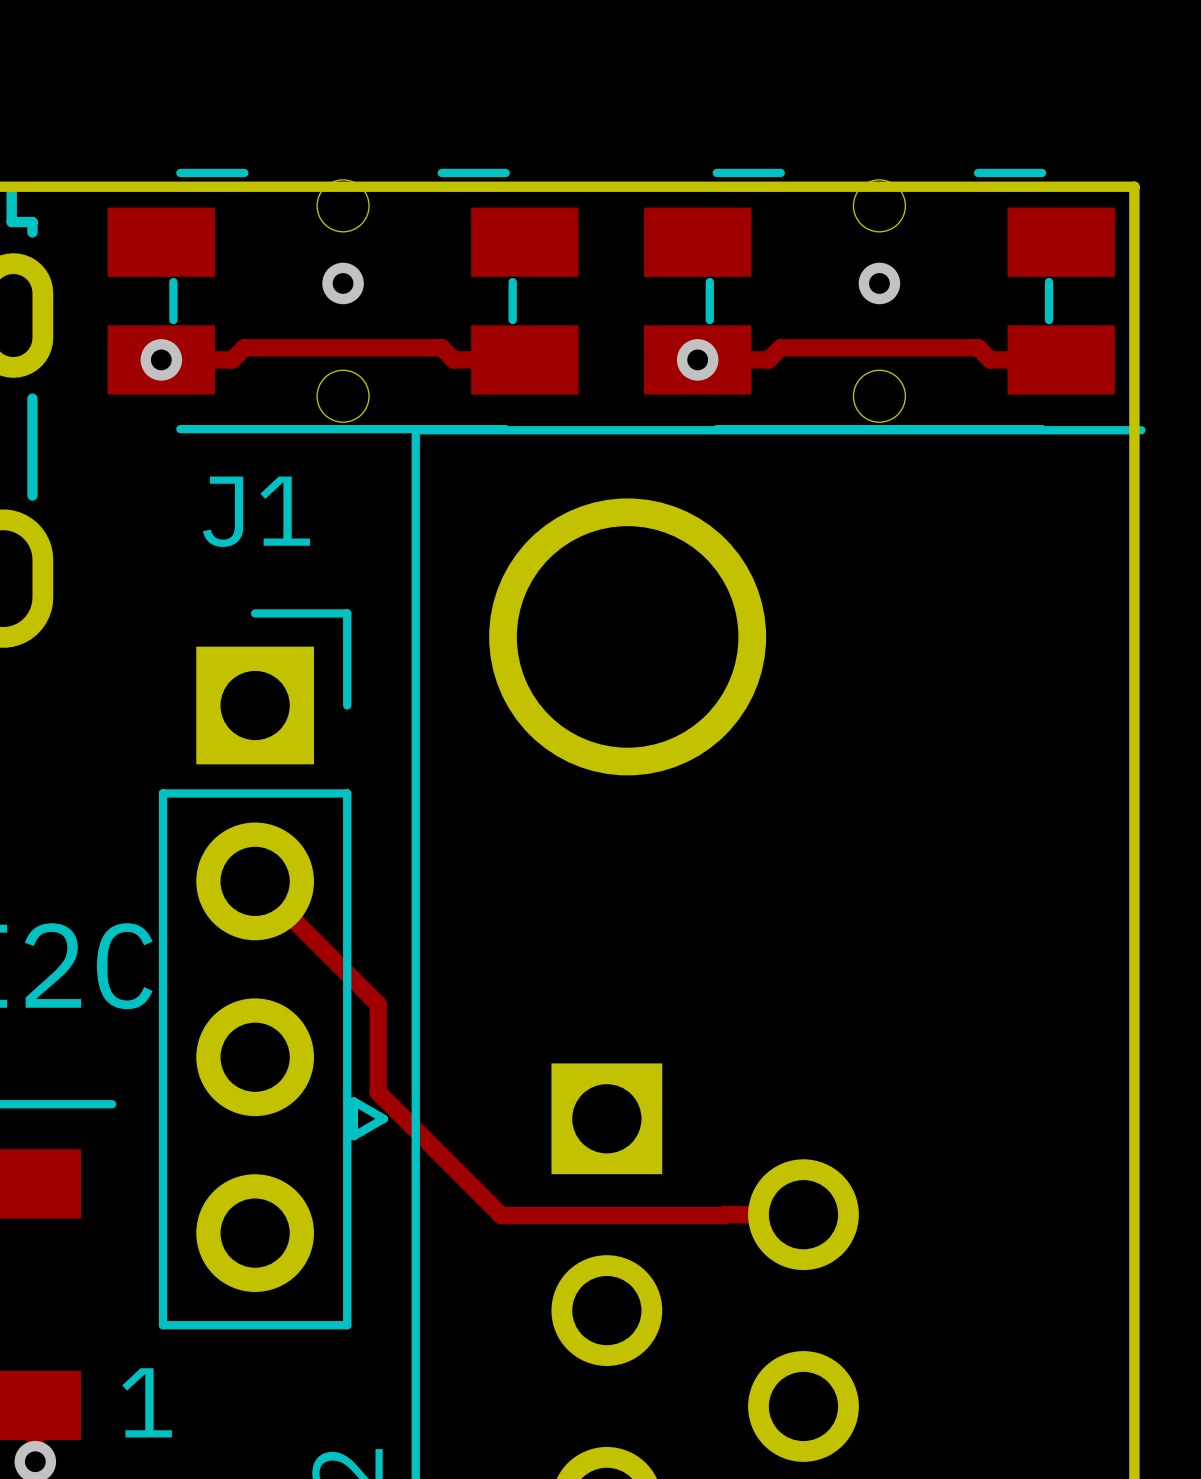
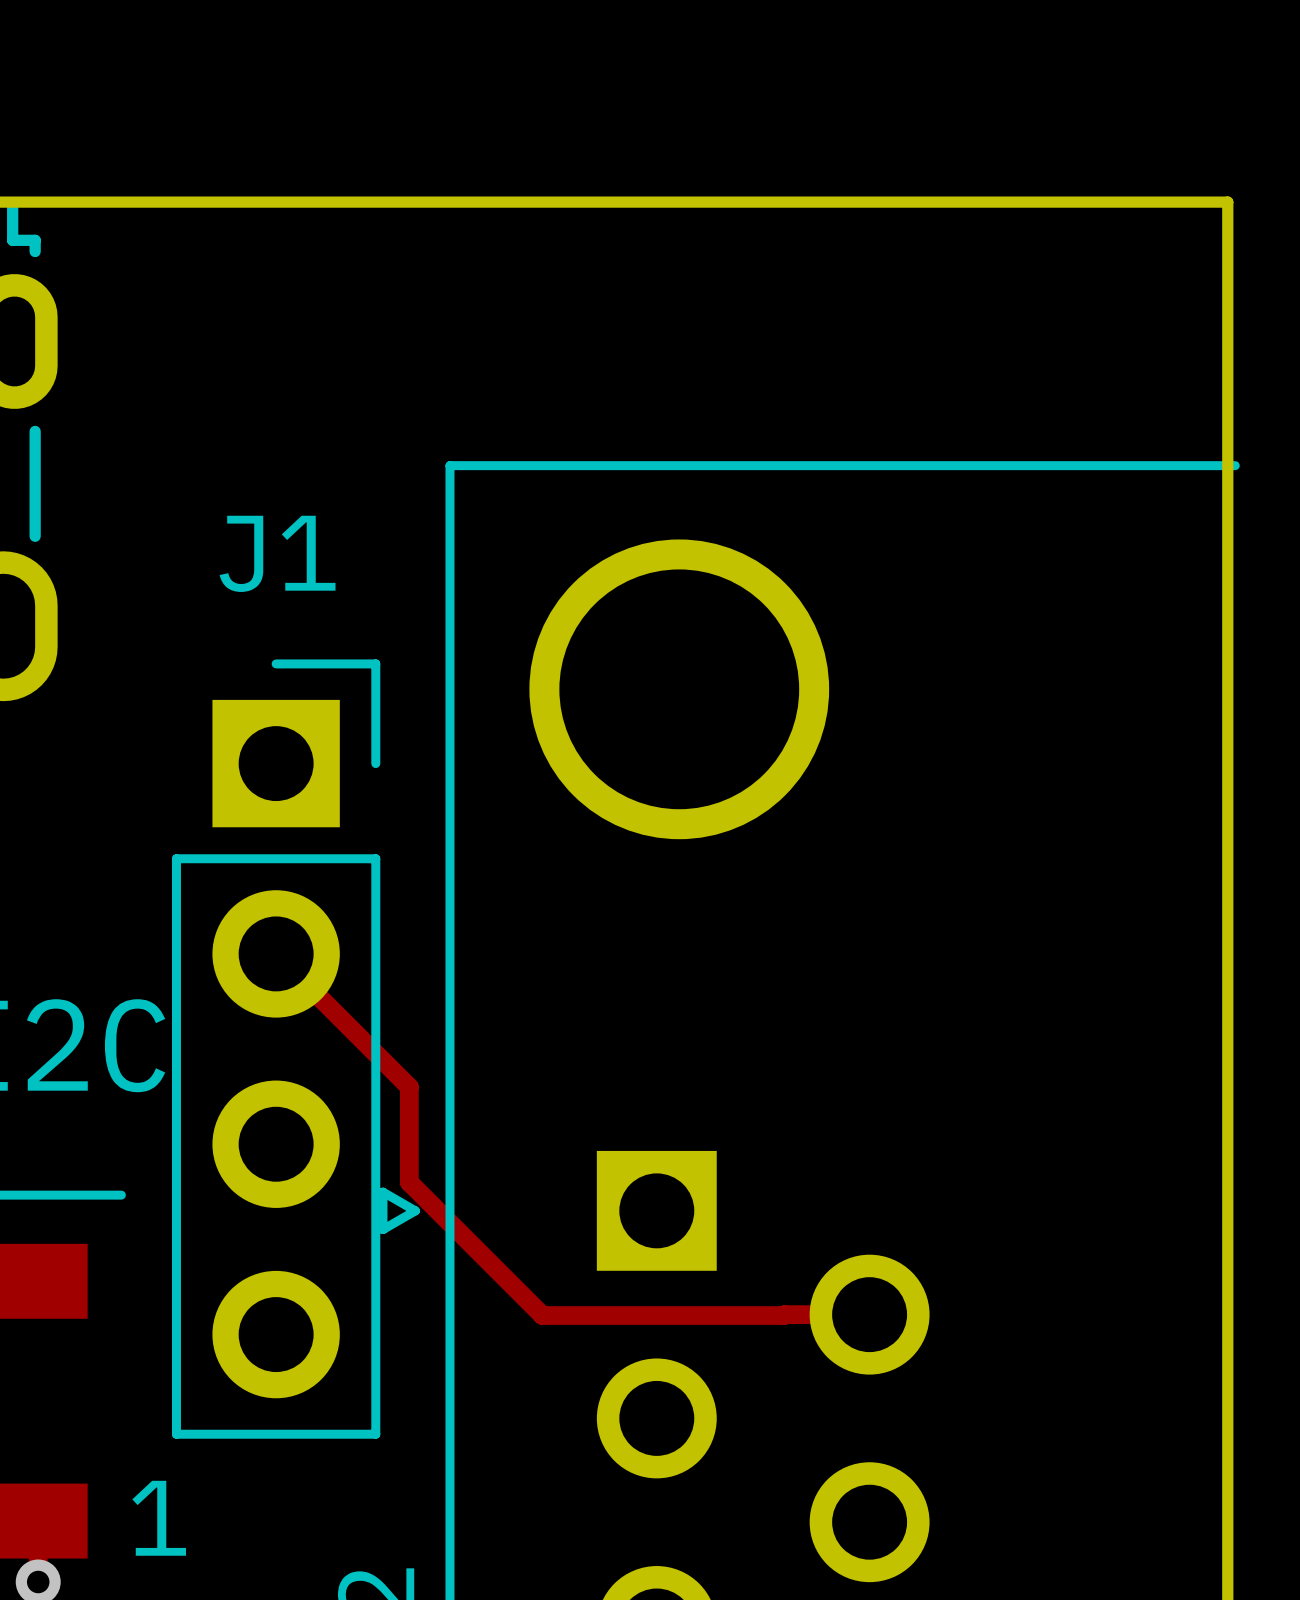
via: (343, 283) -> none
via: (879, 283) -> none
part: (343, 301) -> none
part: (879, 301) -> none
track: (161, 359) (232, 359) (244, 347) (441, 347) (453, 359) (524, 359) -> none
via: (161, 359) -> none
track: (697, 359) (768, 359) (780, 347) (978, 347) (990, 359) (1061, 359) -> none
via: (697, 359) -> none

